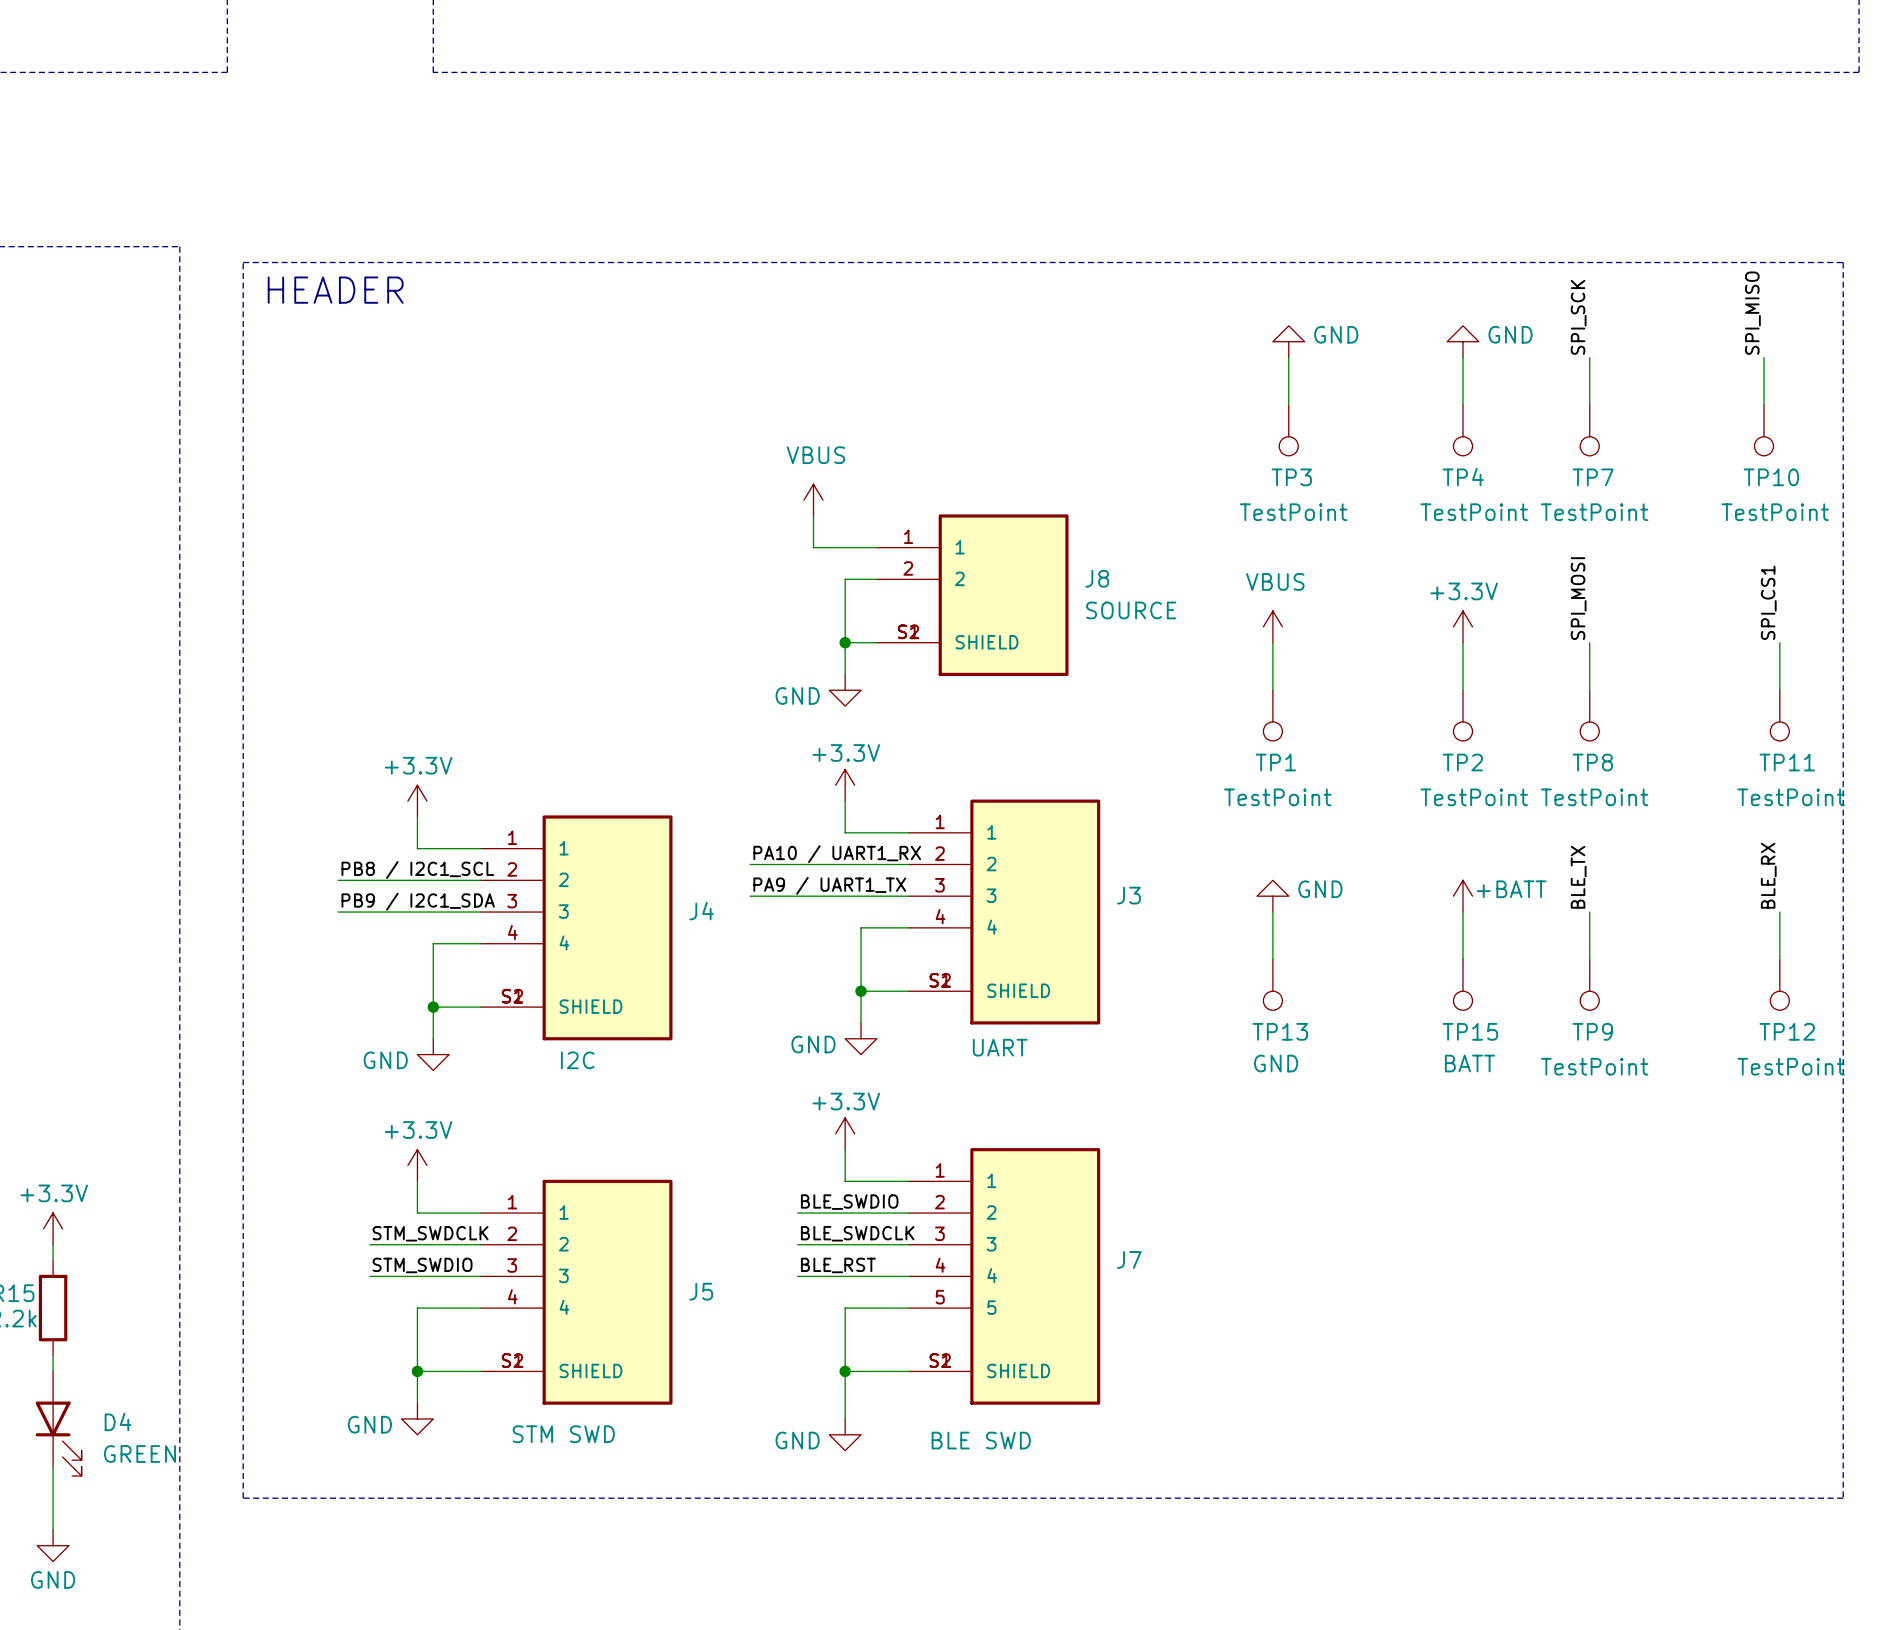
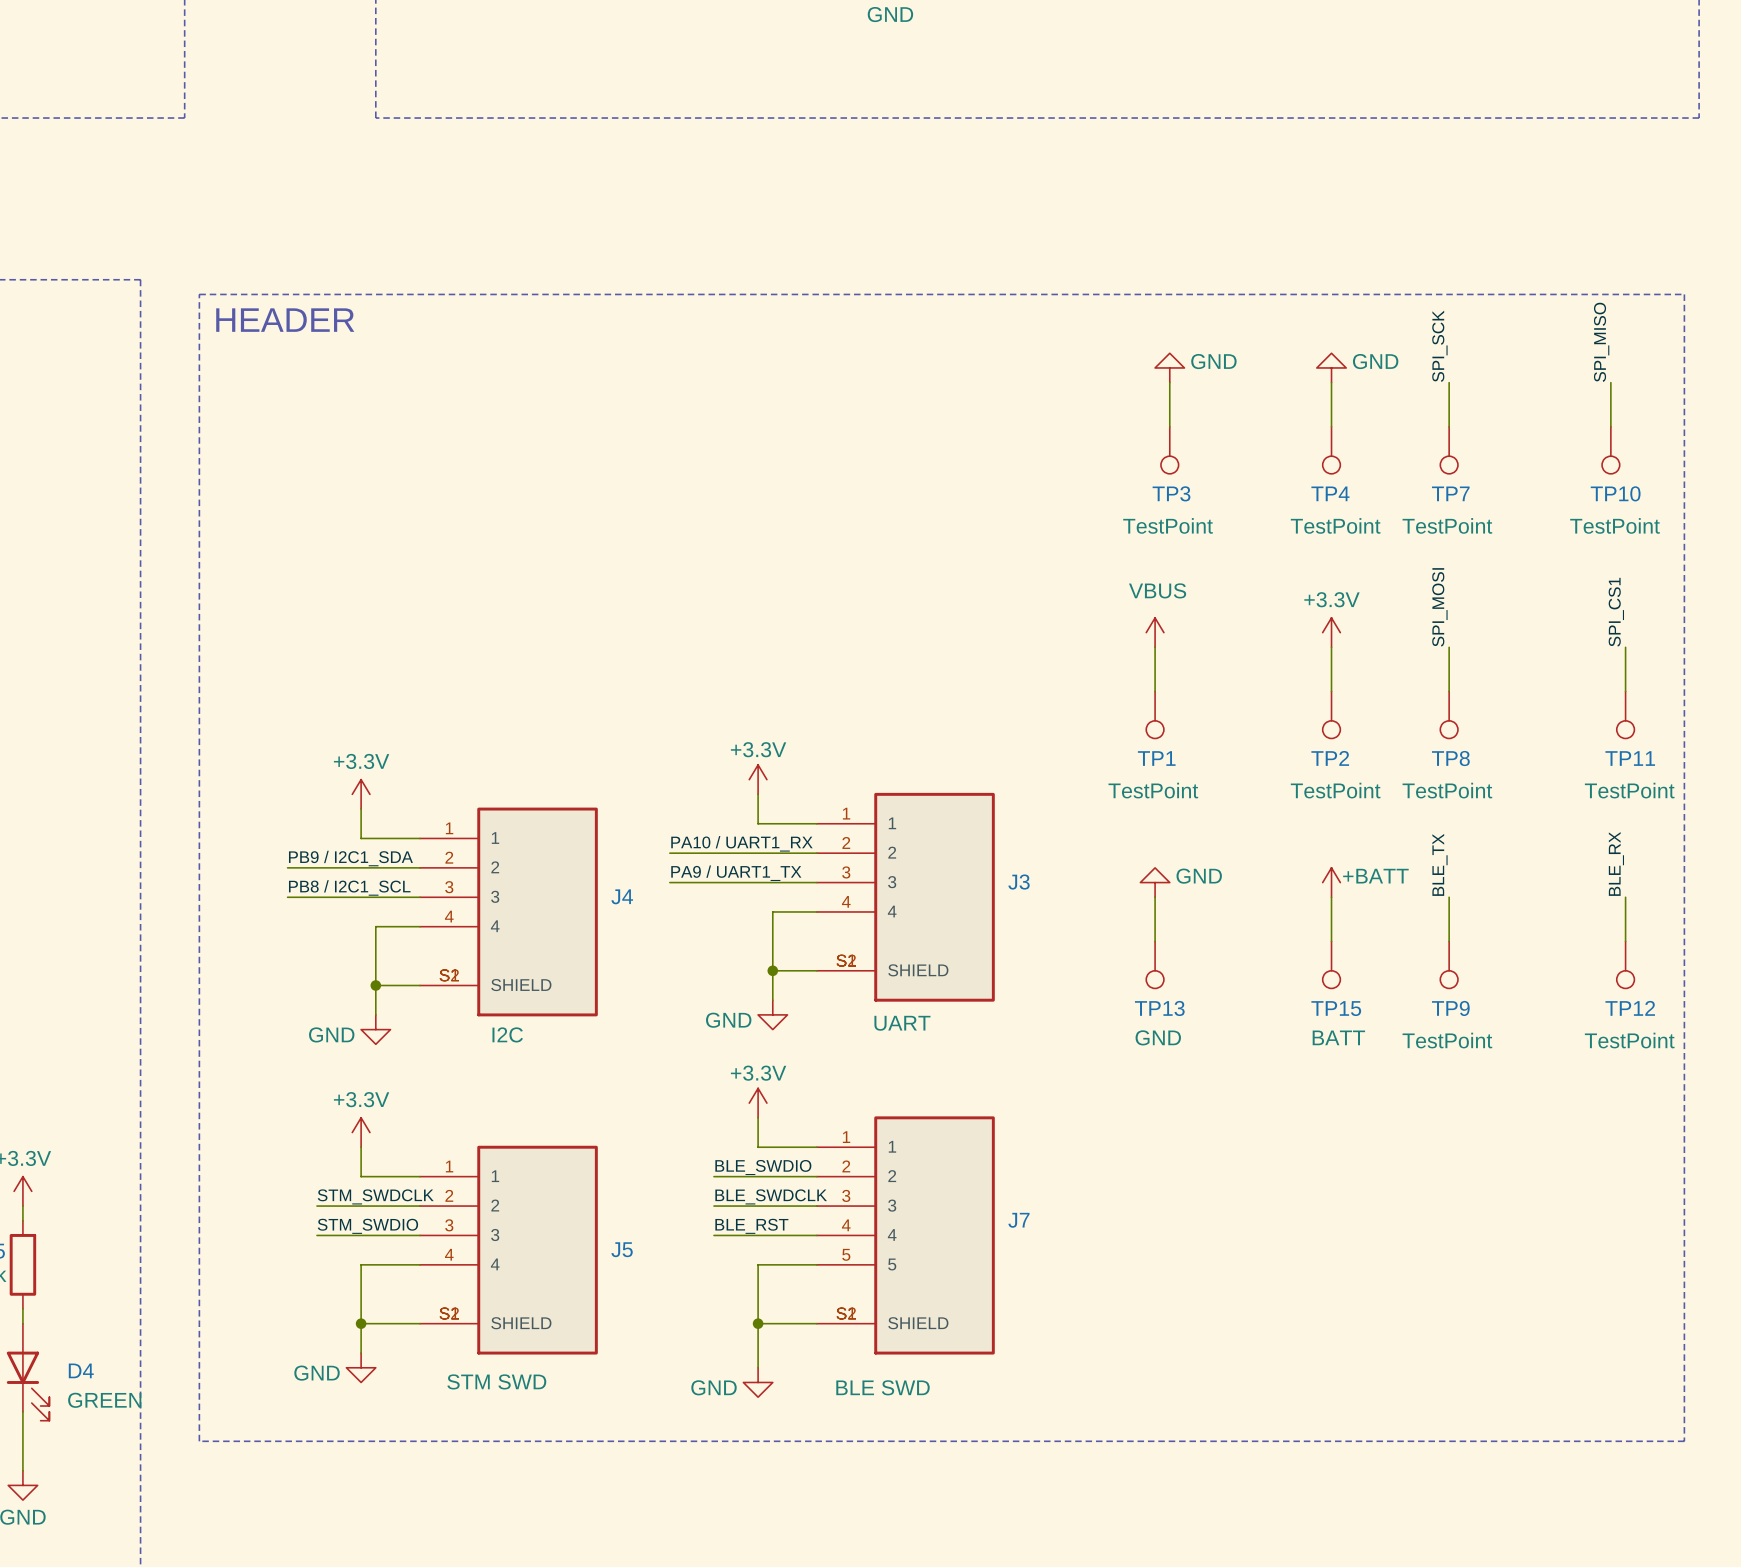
power symbol: VBUS (813, 500) -> none
wire: (813, 515) (813, 547) (876, 547) -> none
wire: (876, 579) (845, 579) (845, 674) -> none
J8: SOURCE (972, 595) -> none
wire: (845, 642) (876, 642) -> none
junction: (845, 642) -> none
power symbol: GND (845, 690) -> none
label: PB8 / I2C1_SCL (417, 869) -> PB9 / I2C1_SDA (350, 858)
label: PB9 / I2C1_SDA (418, 901) -> PB8 / I2C1_SCL (349, 887)

